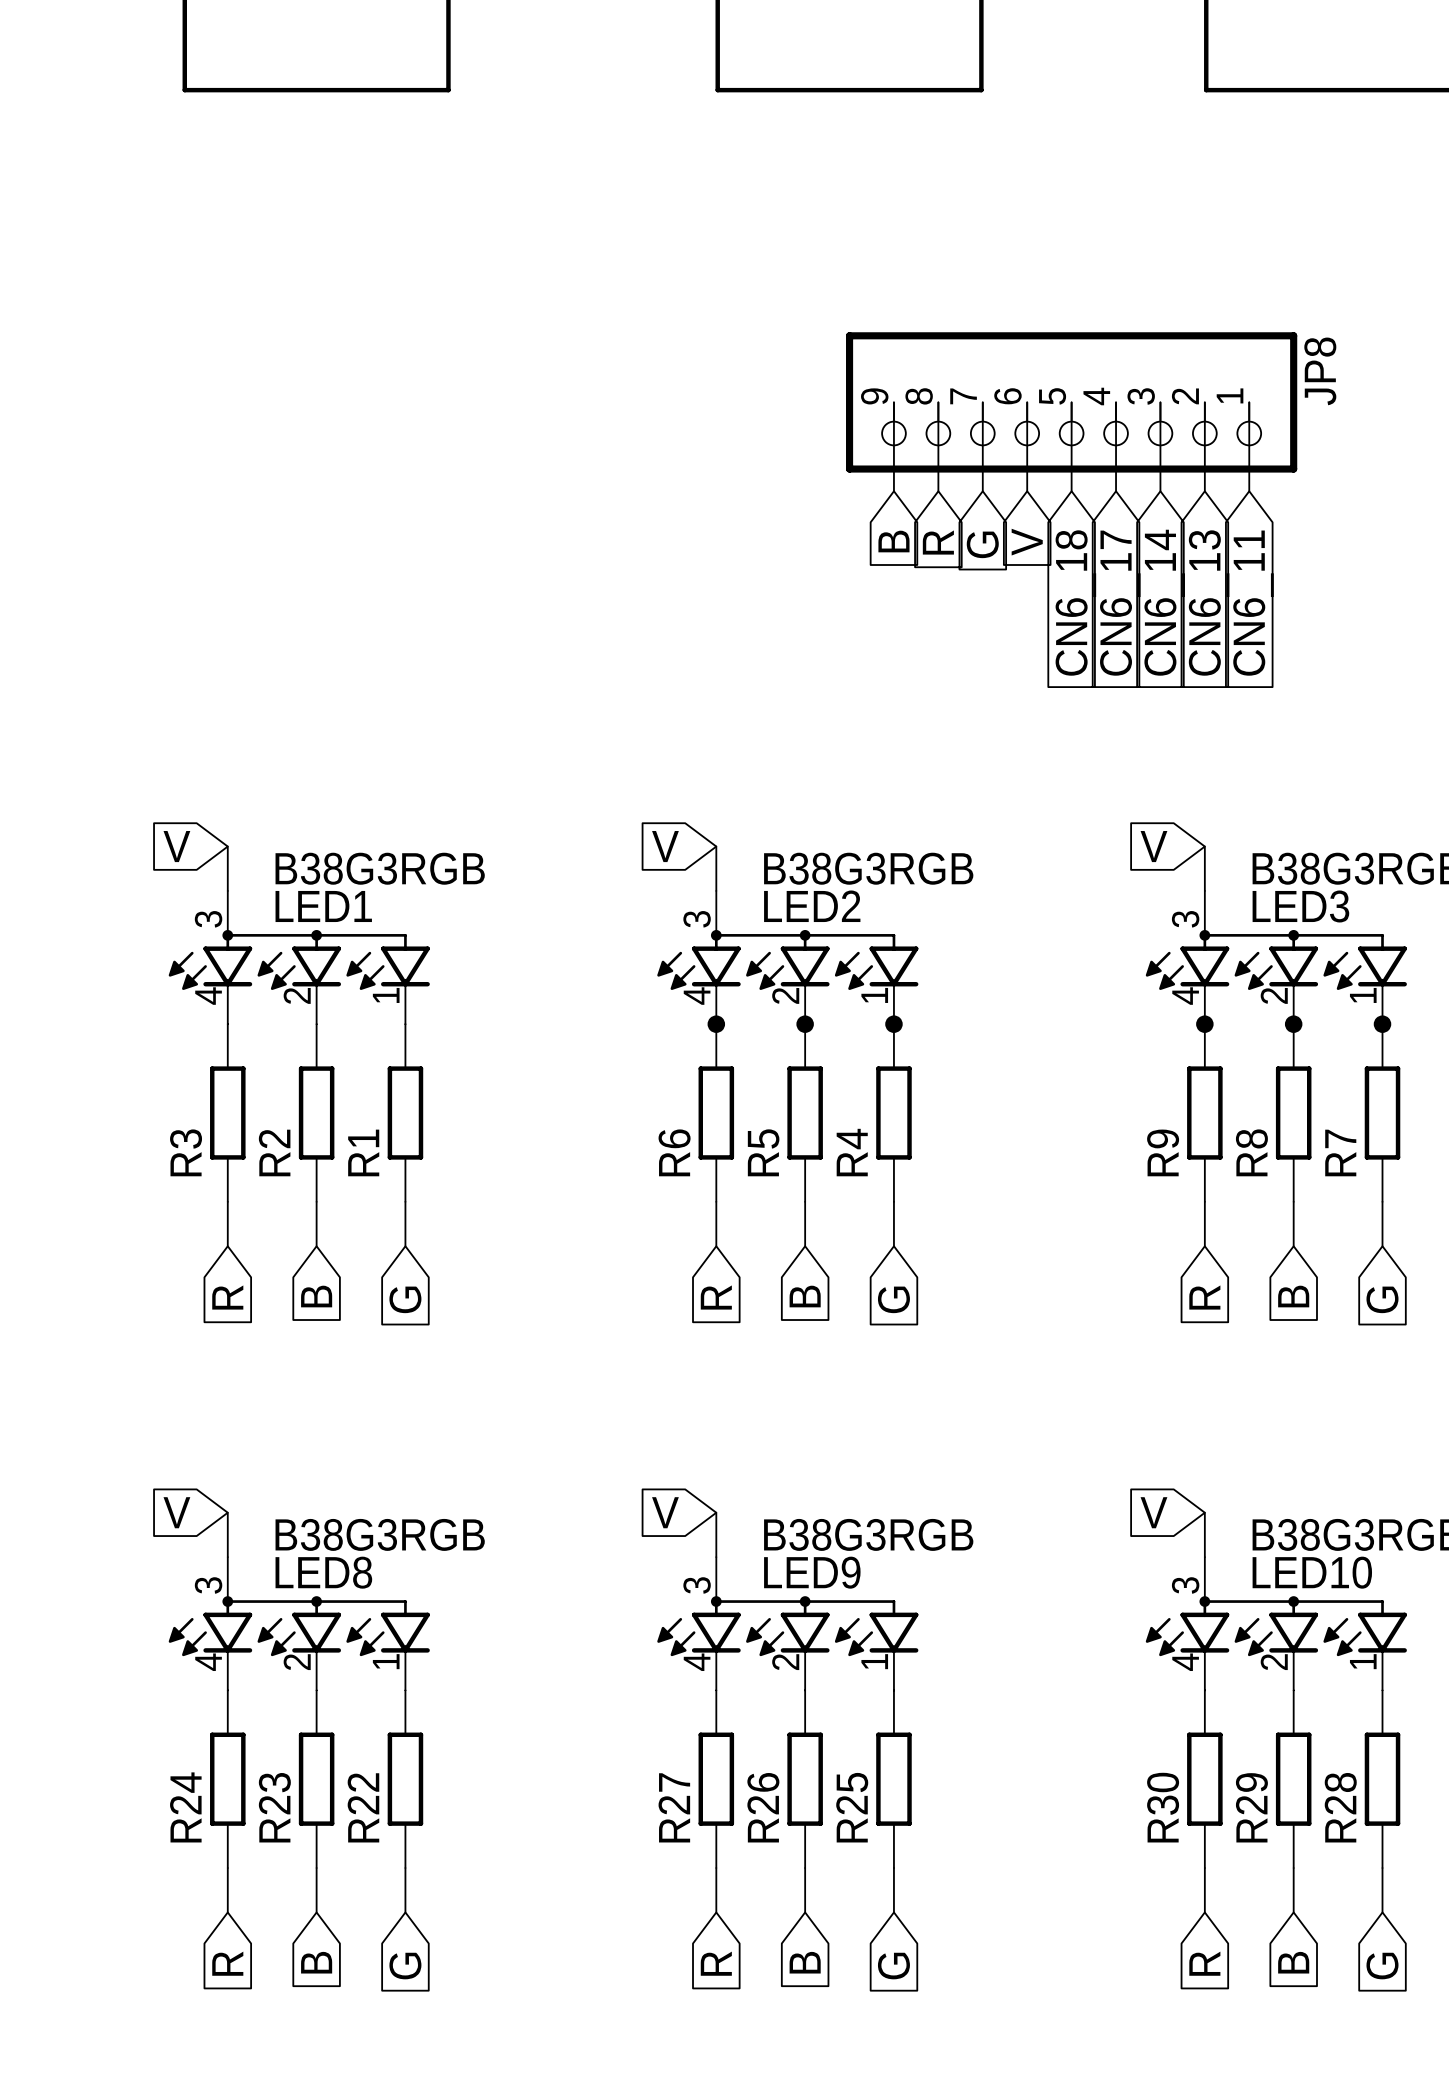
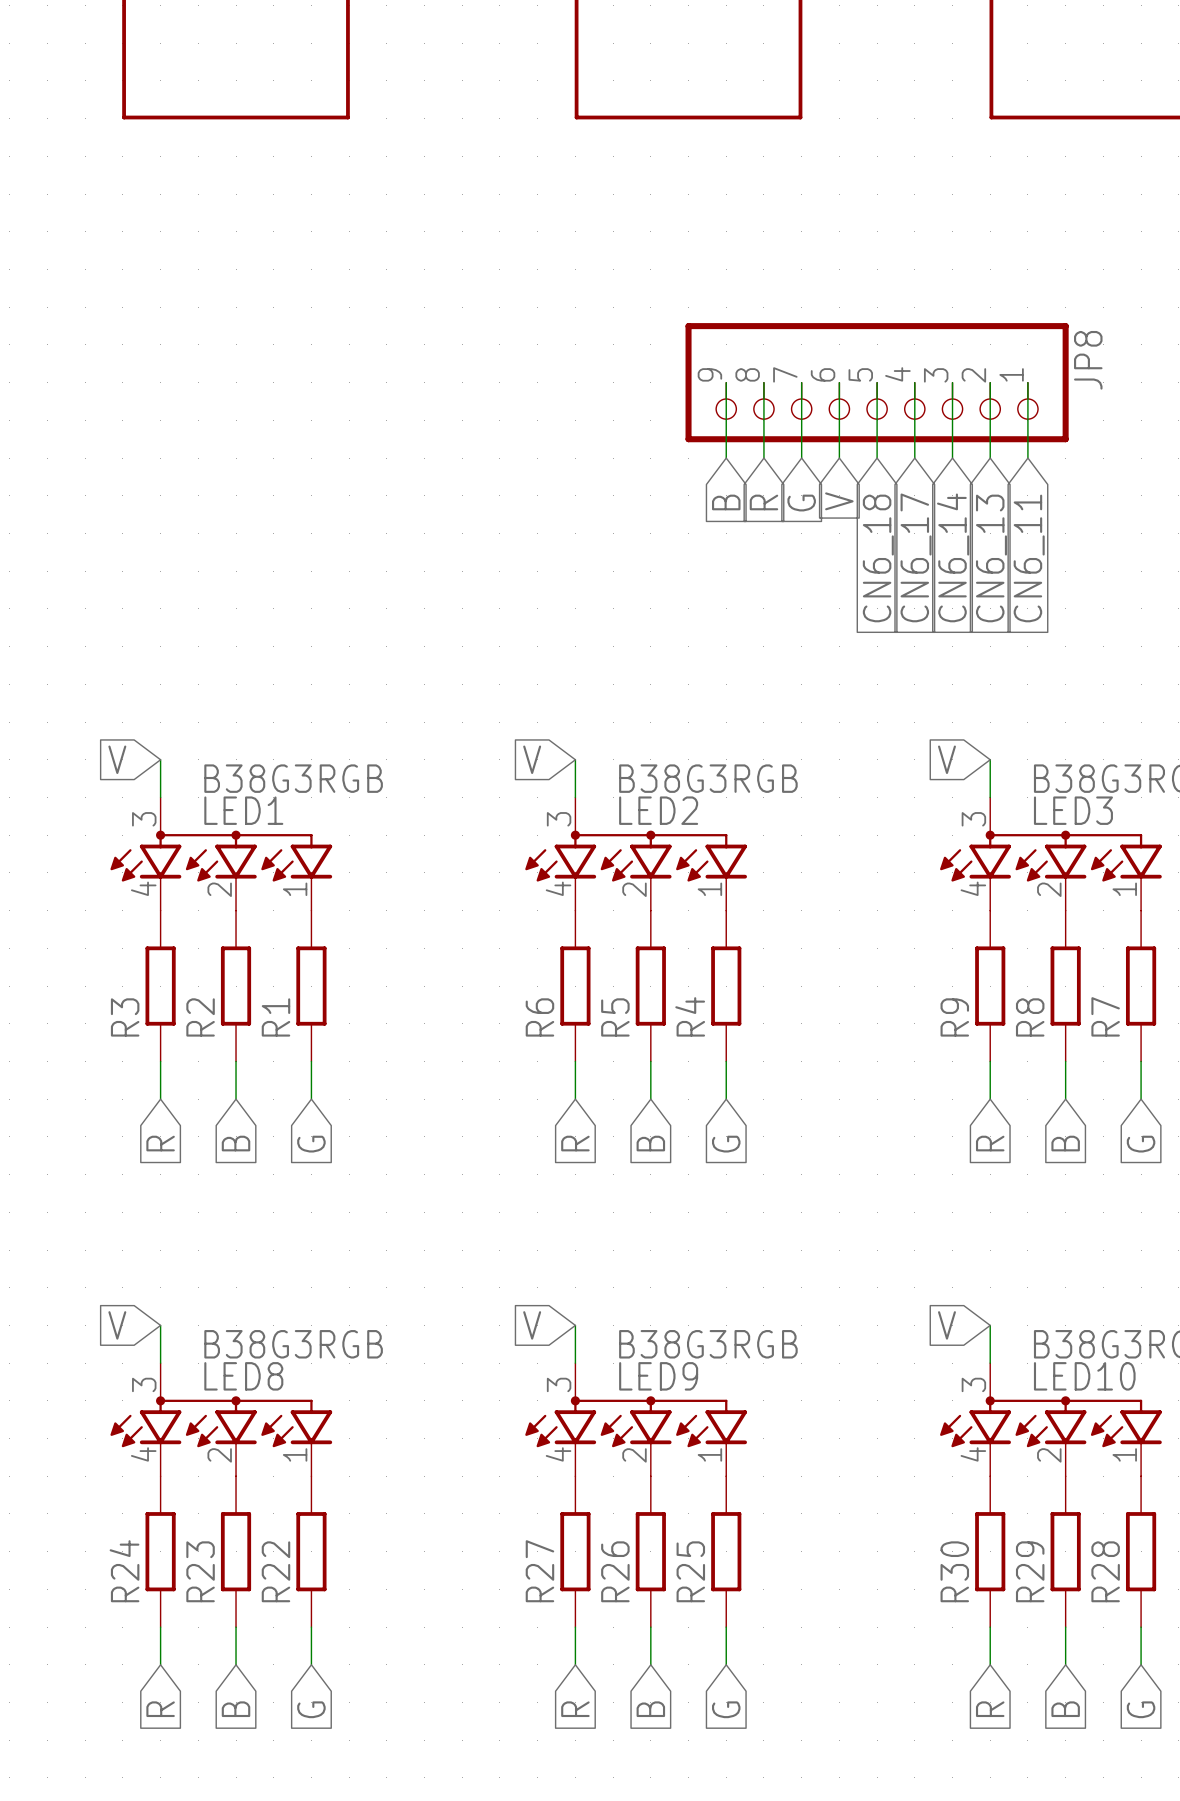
junction: (716, 1024) -> none
junction: (805, 1024) -> none
junction: (893, 1024) -> none
junction: (1204, 1024) -> none
junction: (1293, 1024) -> none
junction: (1382, 1024) -> none

